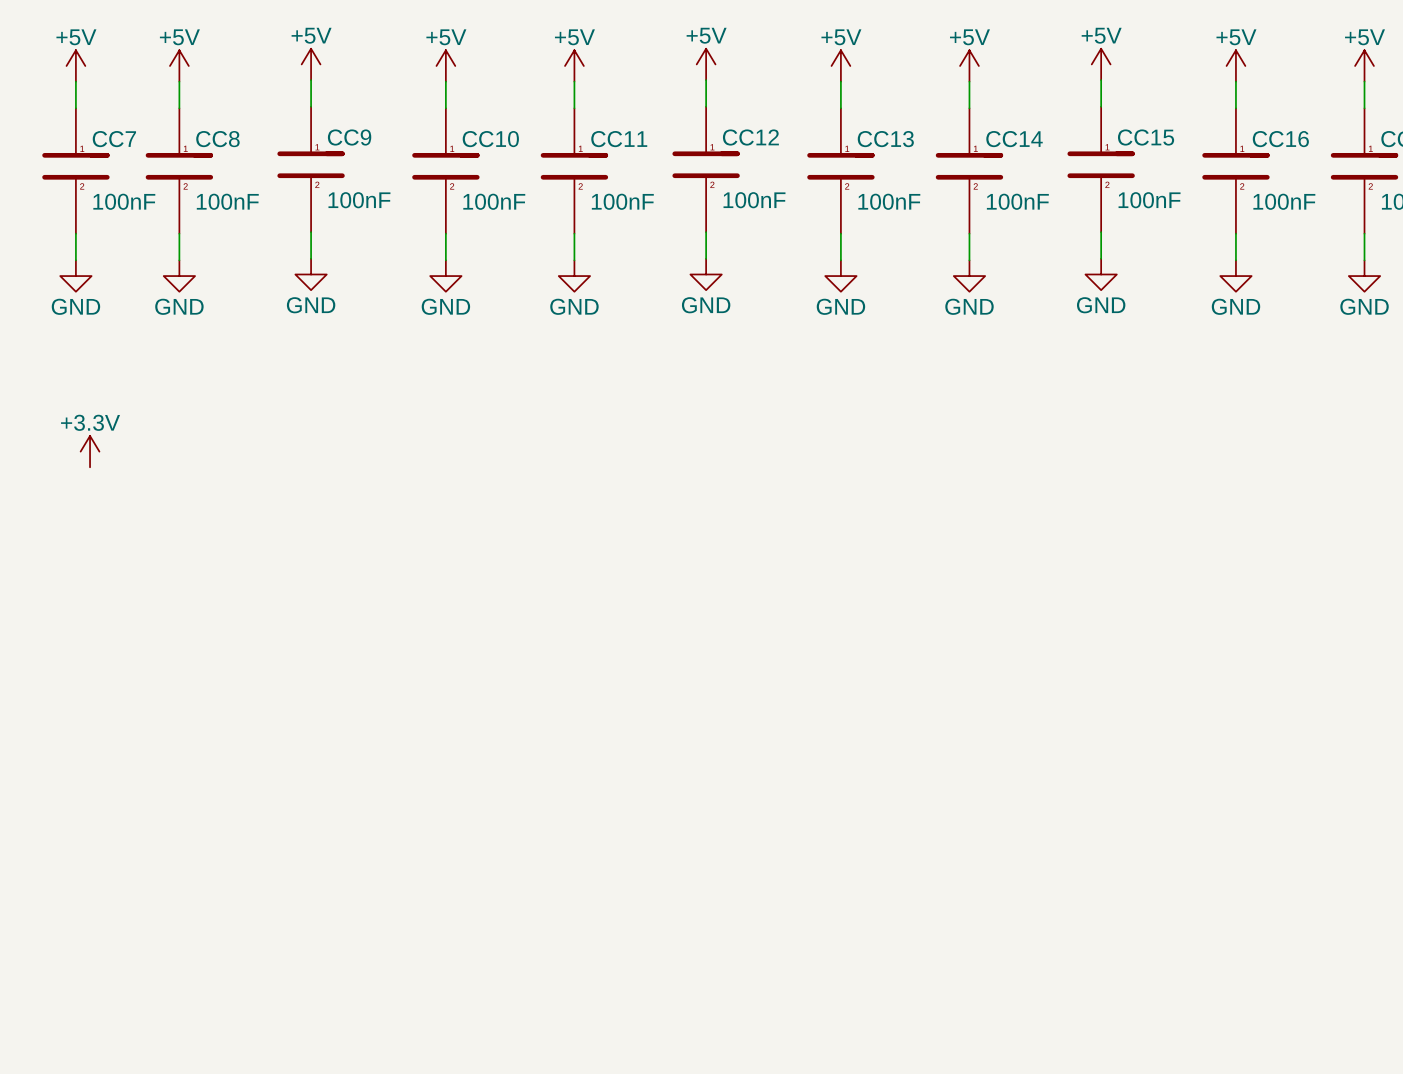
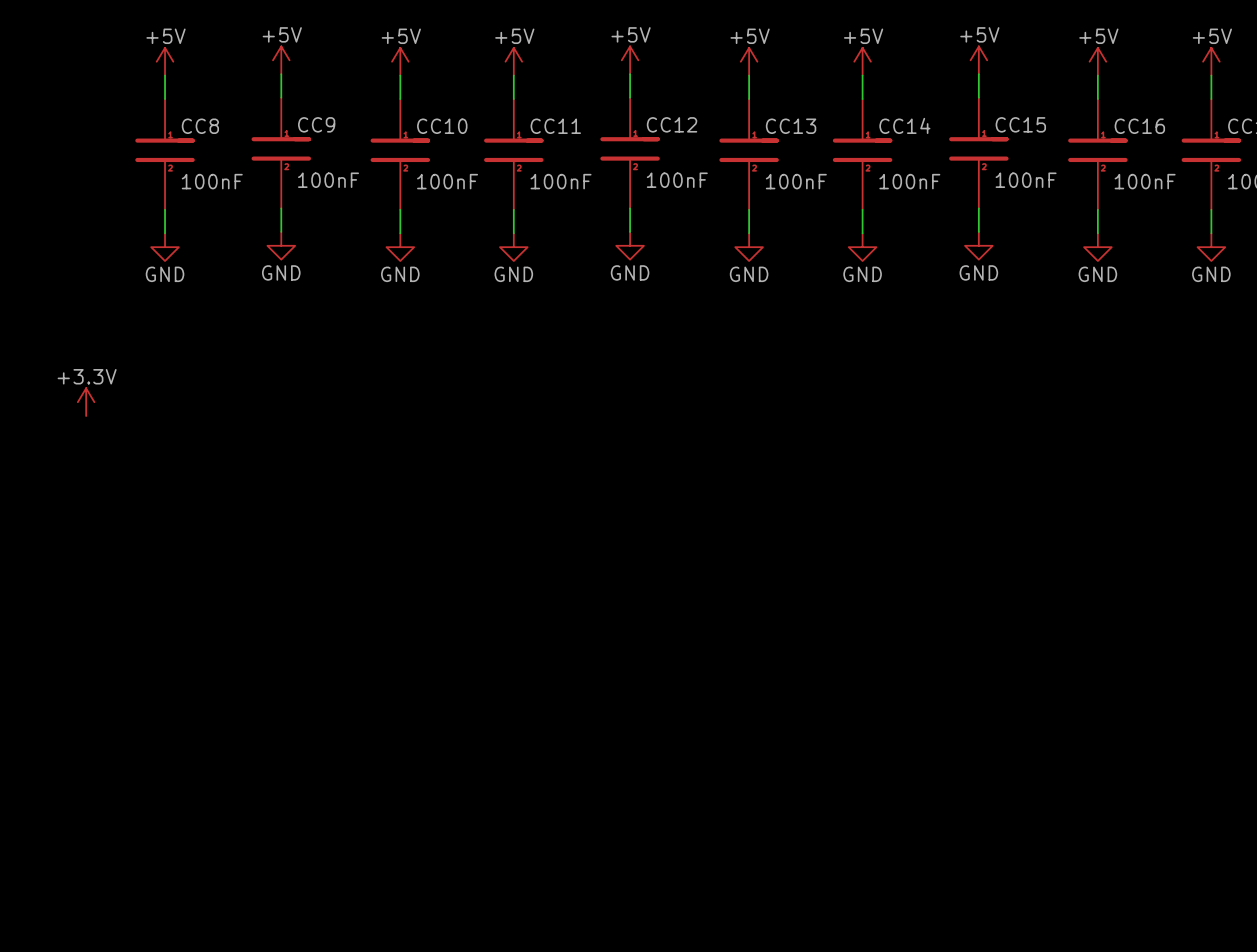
power symbol: +5V (75, 65) -> none
wire: (75, 81) (75, 108) -> none
CC7: 100nF (75, 171) -> none
wire: (75, 233) (75, 260) -> none
power symbol: GND (75, 276) -> none

